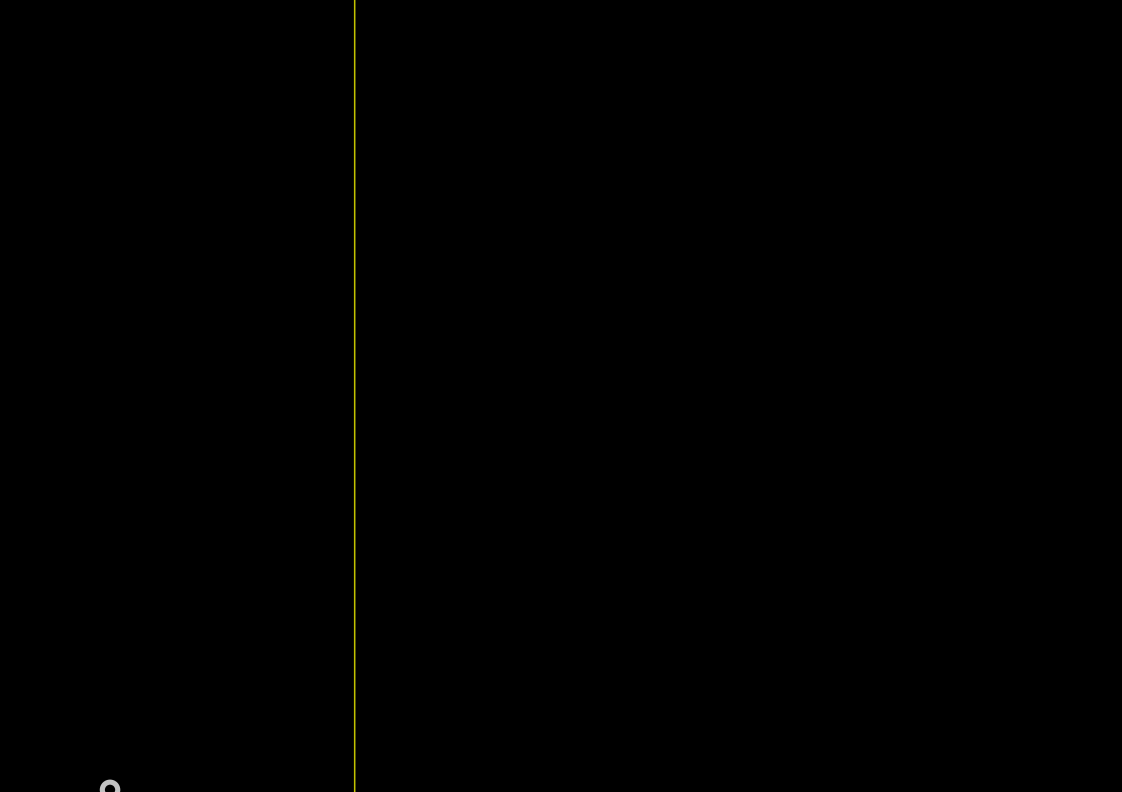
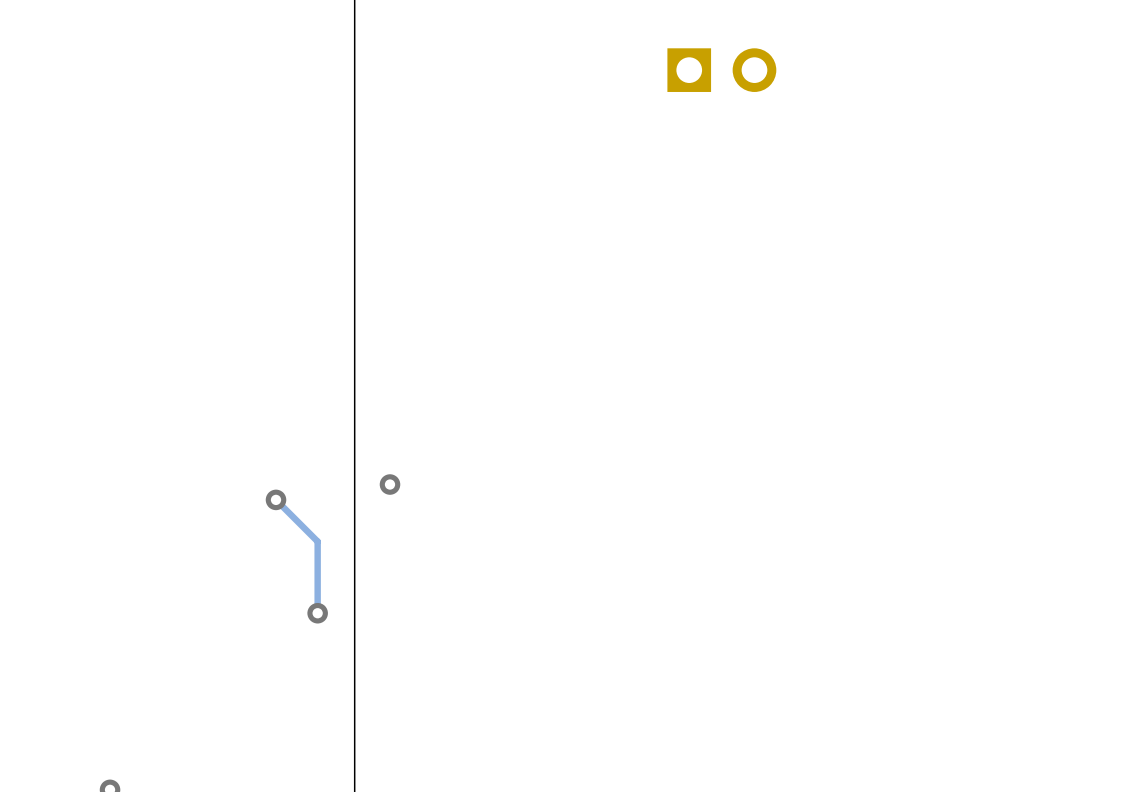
part: none -> (721, 70)
via: none -> (389, 484)
track: none -> (276, 499) (317, 541) (317, 613)
via: none -> (276, 499)
via: none -> (317, 613)

